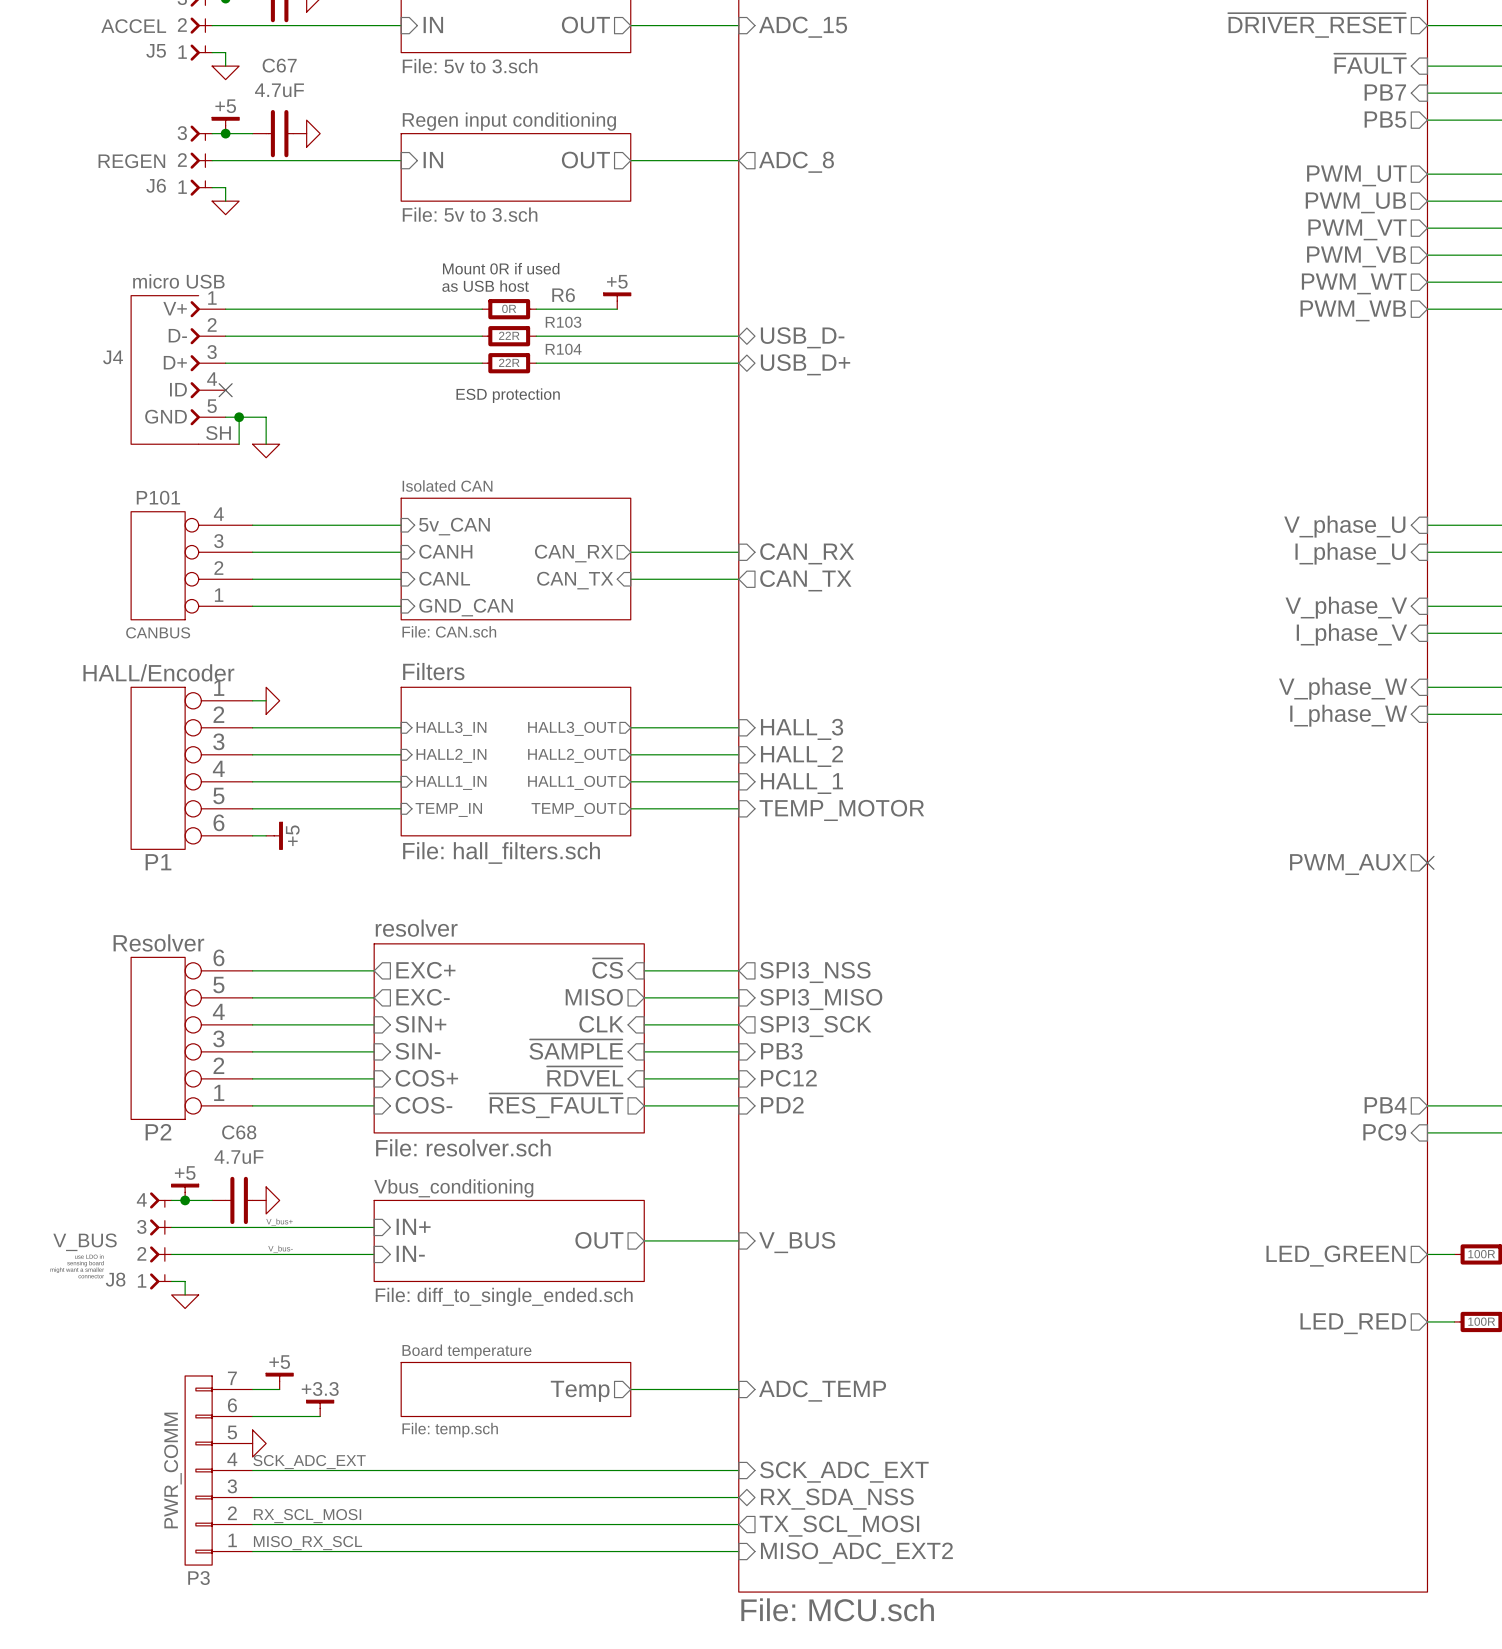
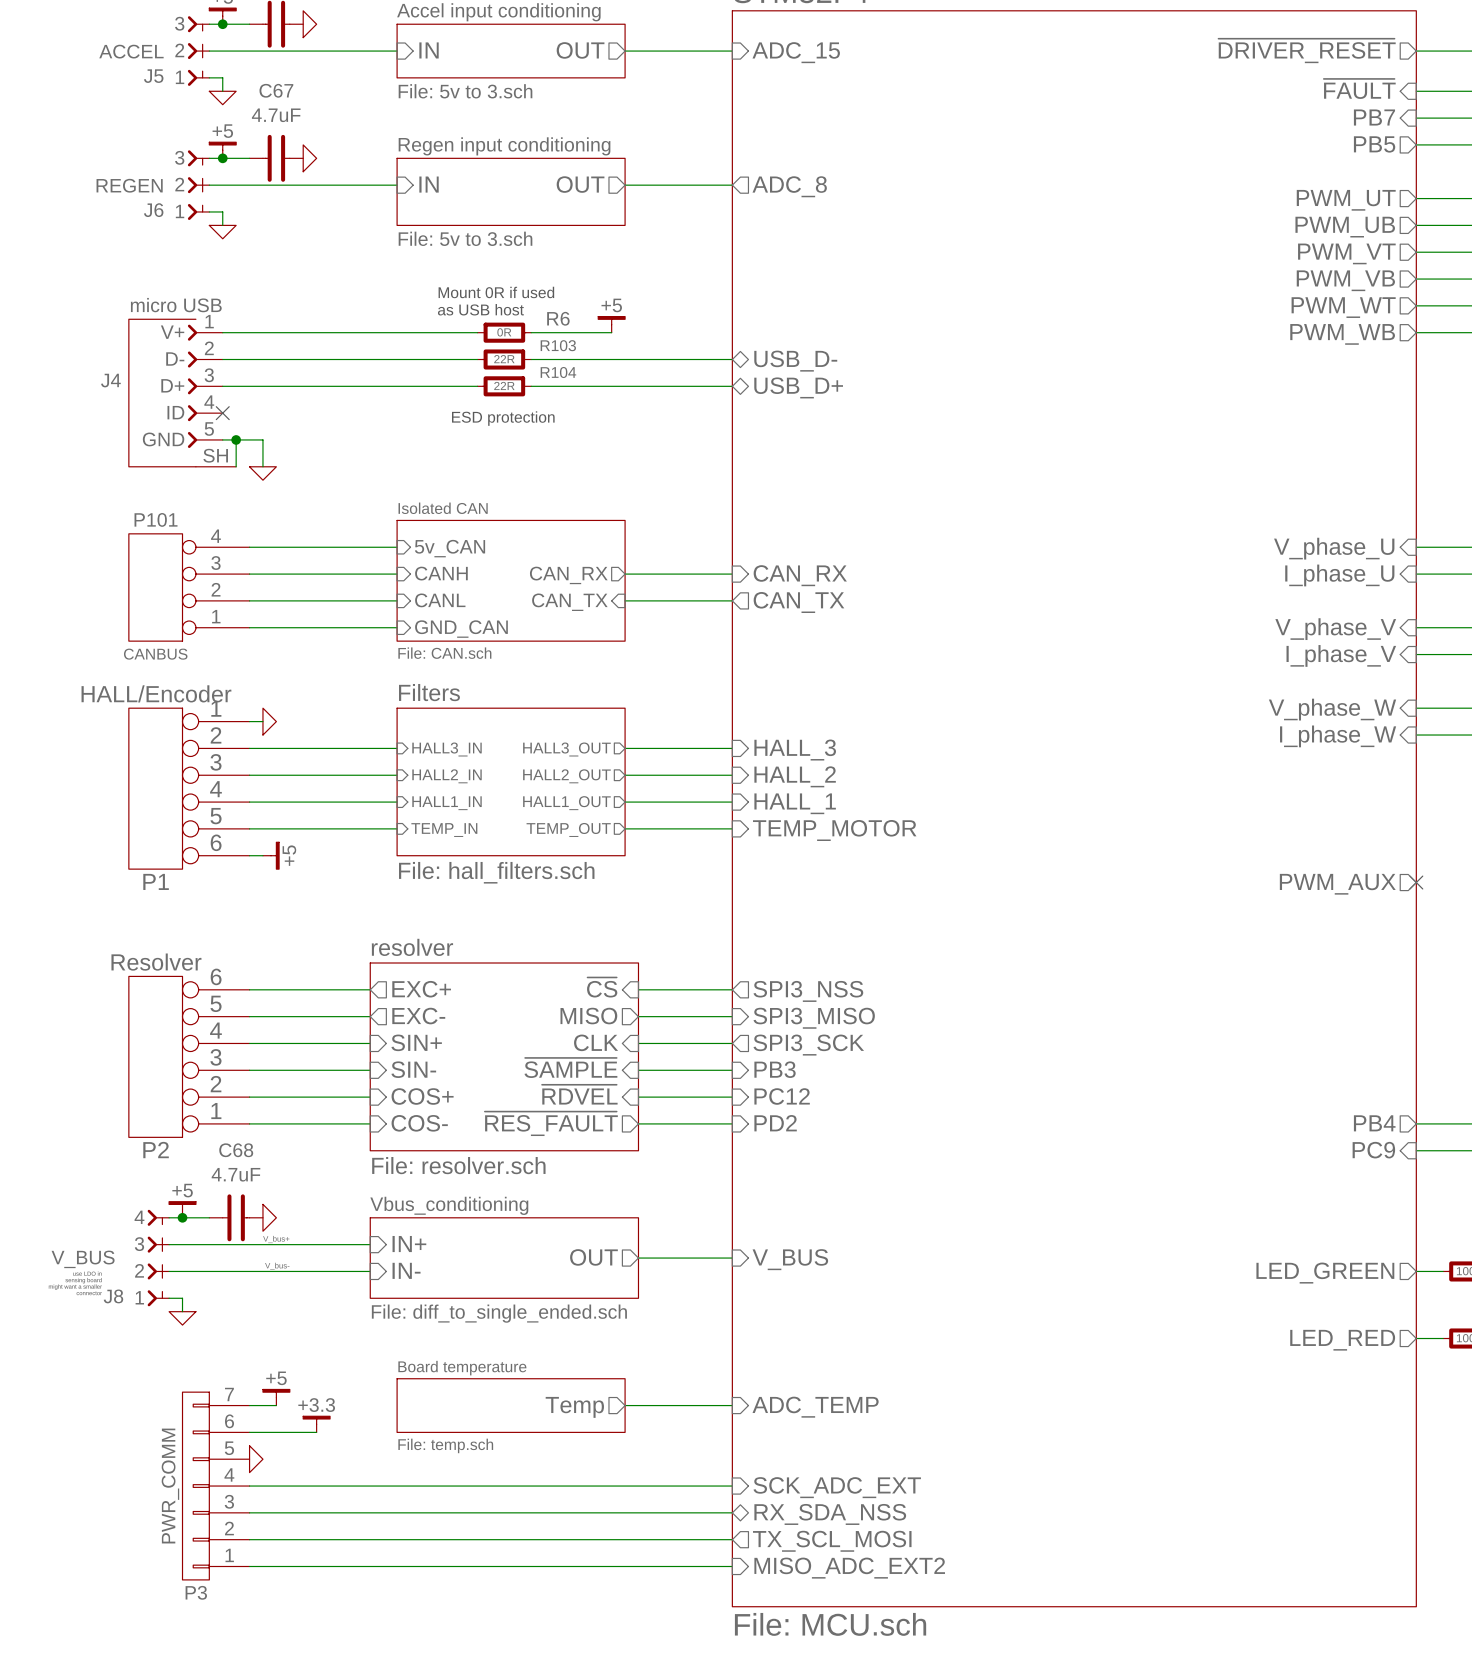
label: SCK_ADC_EXT (309, 1462) -> none
label: RX_SCL_MOSI (307, 1516) -> none
label: MISO_RX_SCL (308, 1543) -> none

